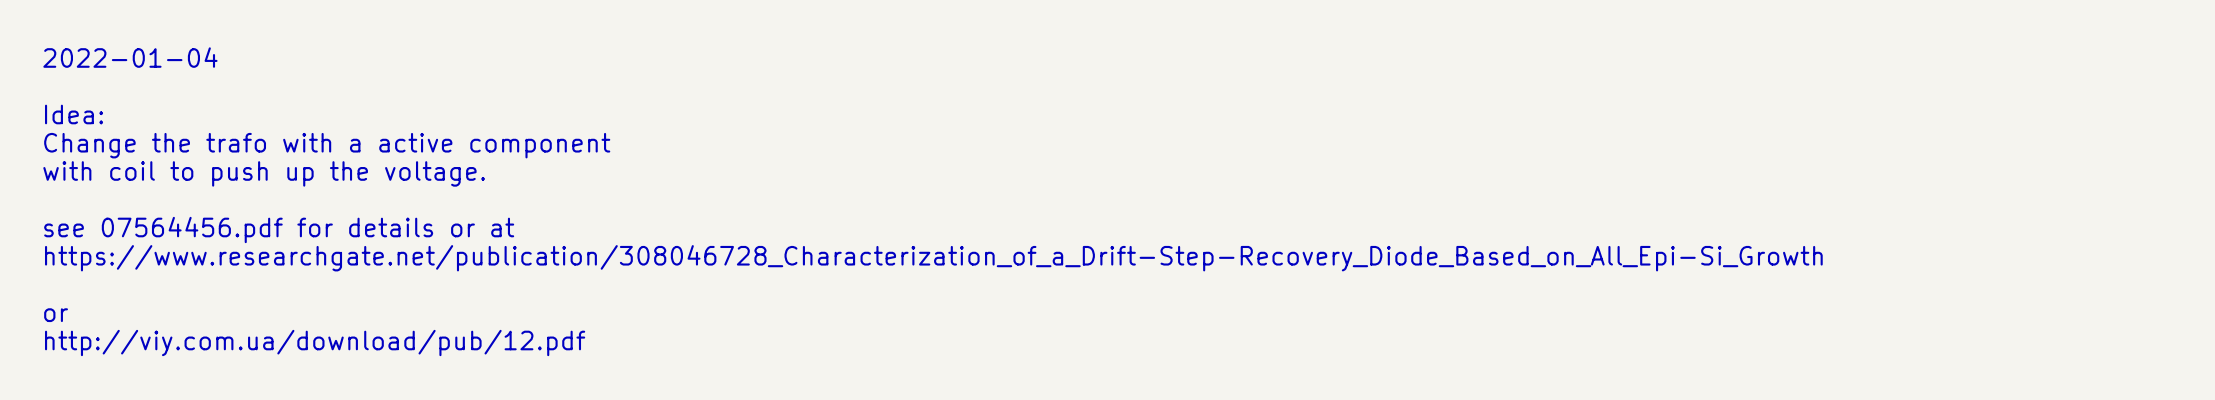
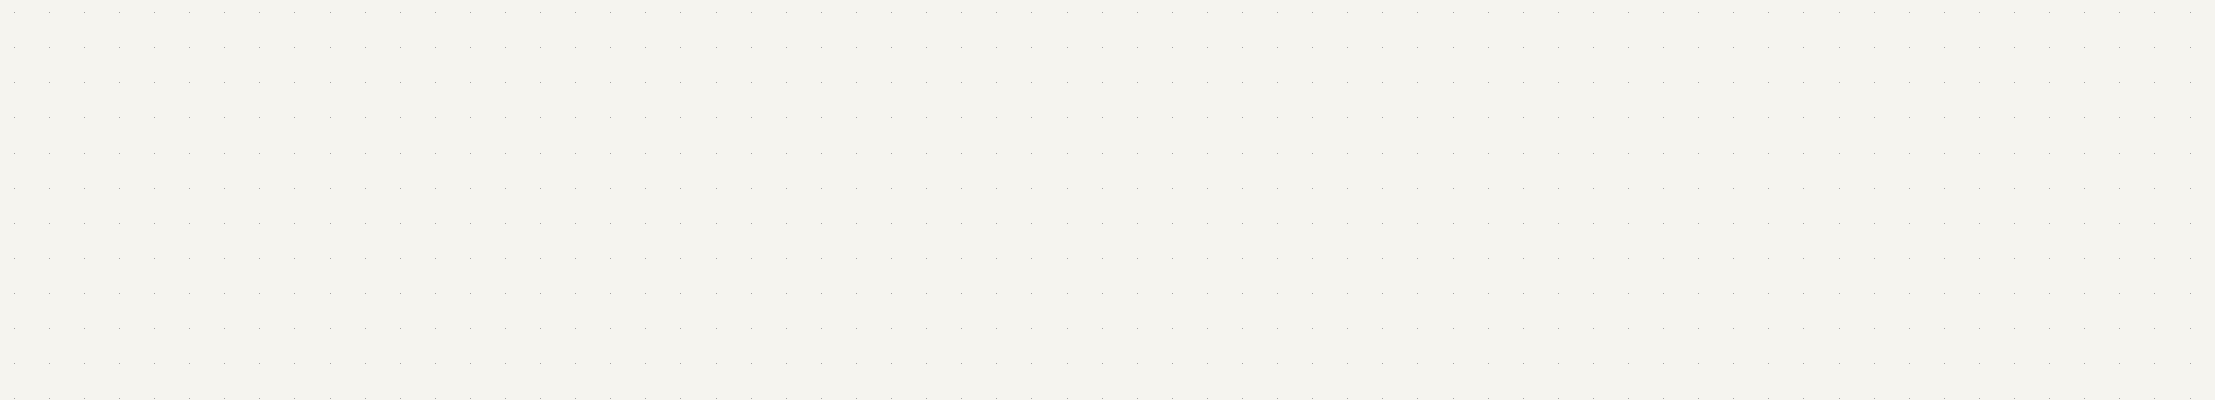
text: 2022-01-04 (130, 57) -> none
text: Idea: (74, 114) -> none
text: Change the trafo with a active component (327, 145) -> none
text: with coil to push up the voltage. (264, 173) -> none
text: see 07564456.pdf for details or at (279, 230) -> none
text: https://www.researchgate.net/publication/308046728_Characterization_of_a_Drift-Step-Recovery_Diode_Based_on_All_Epi-Si_Growth (933, 258) -> none
text: or (56, 315) -> none
text: http://viy.com.ua/download/pub/12.pdf (315, 343) -> none

